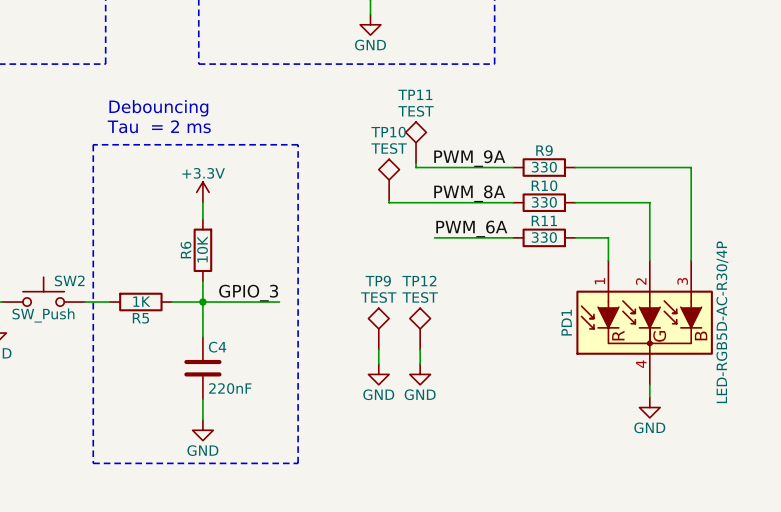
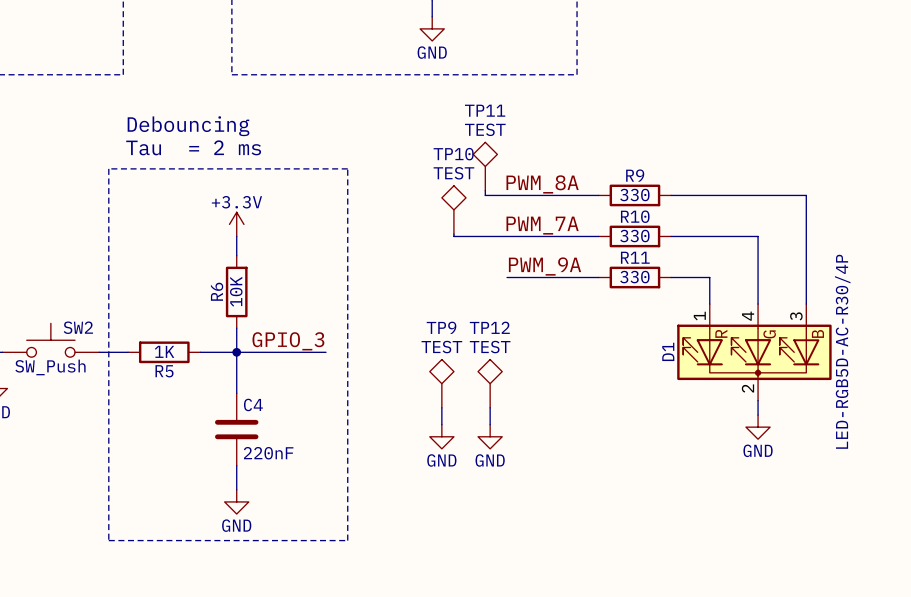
label: PWM_9A (469, 158) -> PWM_8A (542, 184)
label: PWM_8A (469, 193) -> PWM_7A (542, 225)
label: PWM_6A (471, 228) -> PWM_9A (545, 266)
D1: none -> LED-RGB5D-AC-R30/4P (754, 352)
PD1: LED-RGB5D-AC-R30/4P (644, 322) -> none
power symbol position: GND (649, 407) -> GND (758, 427)

